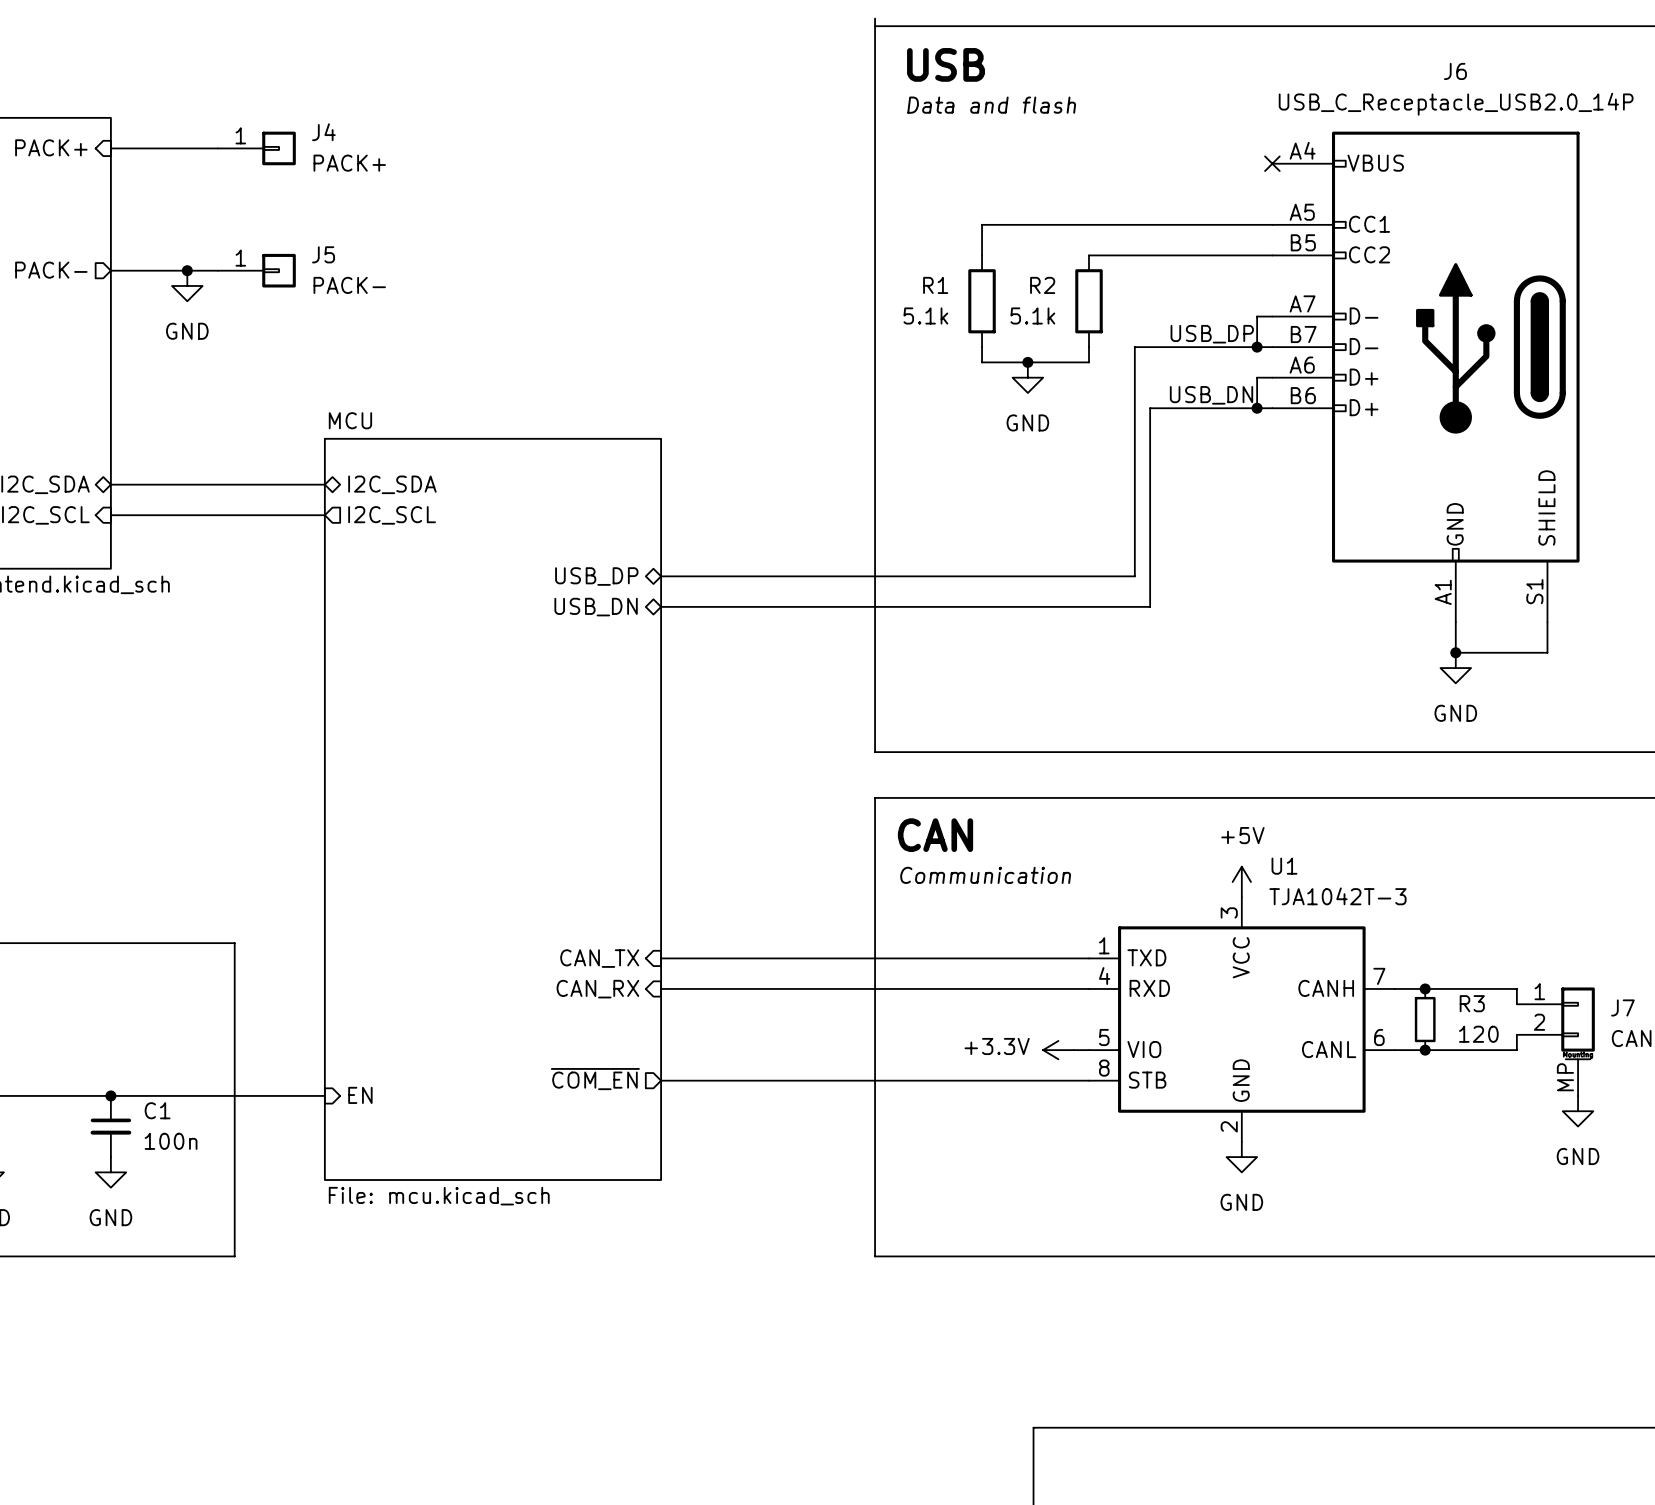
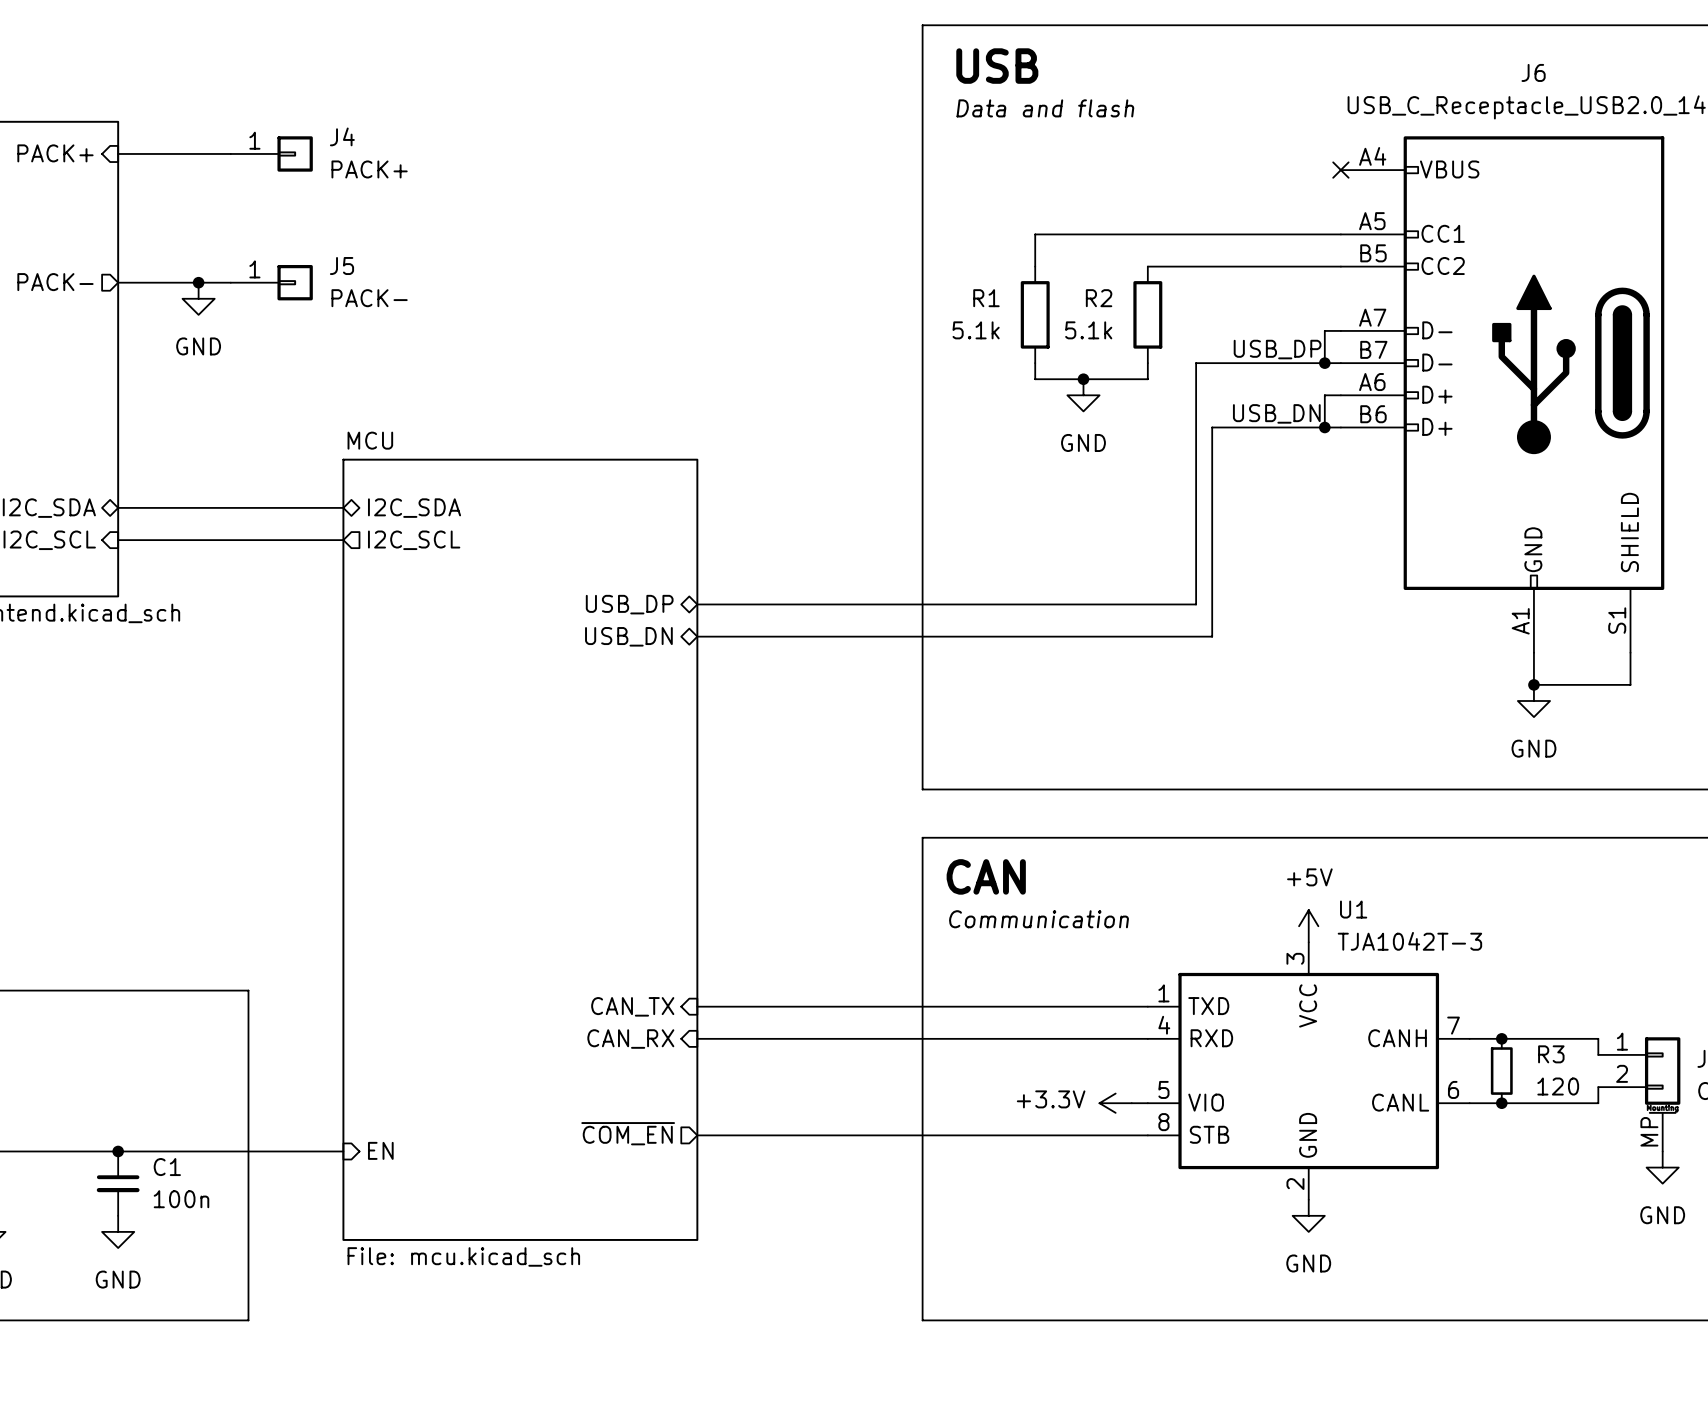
line: (875, 18) (875, 26) -> none

